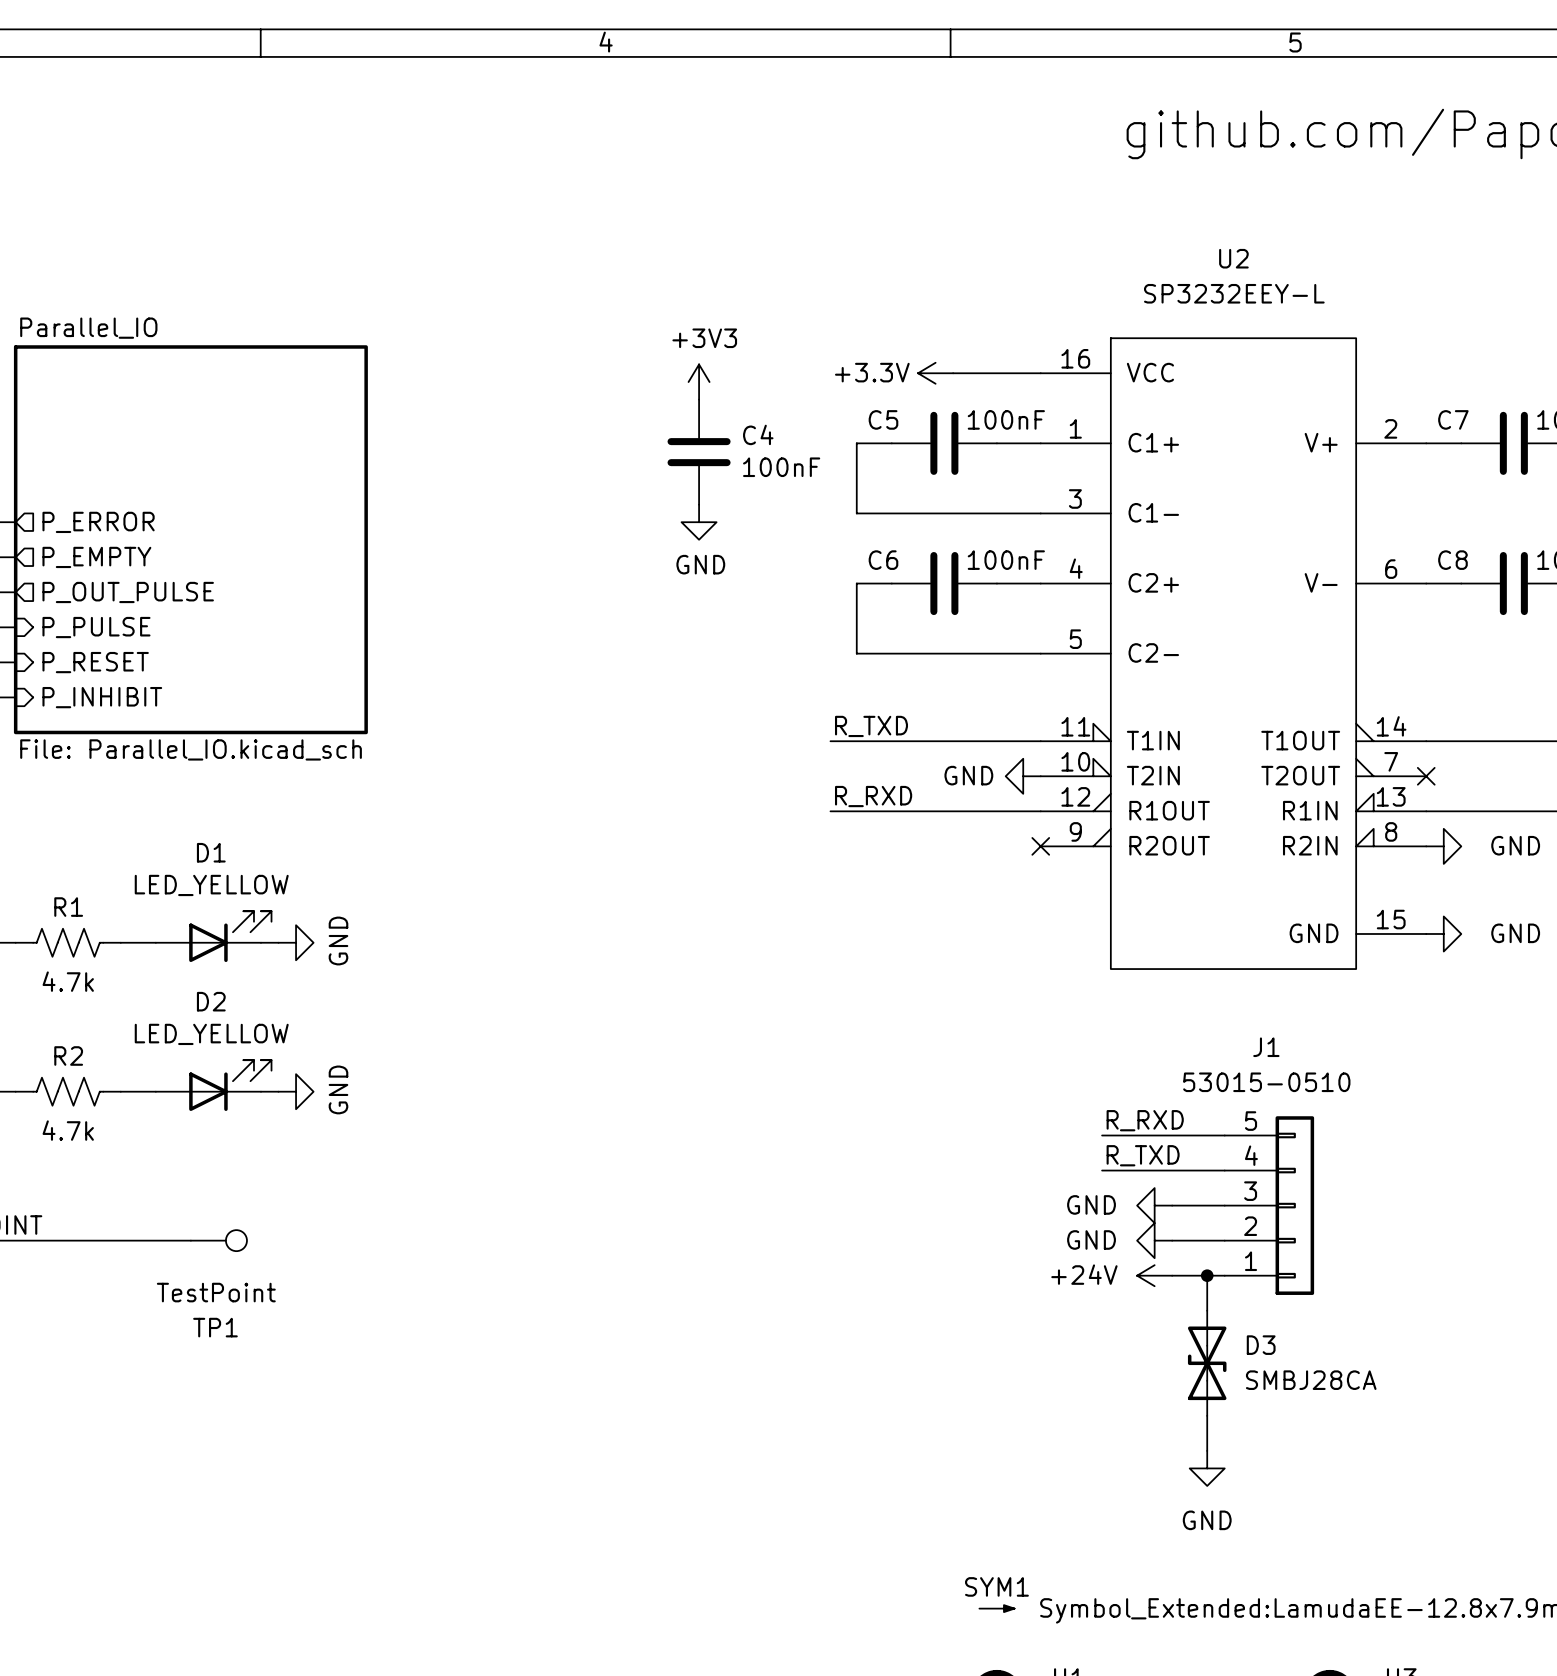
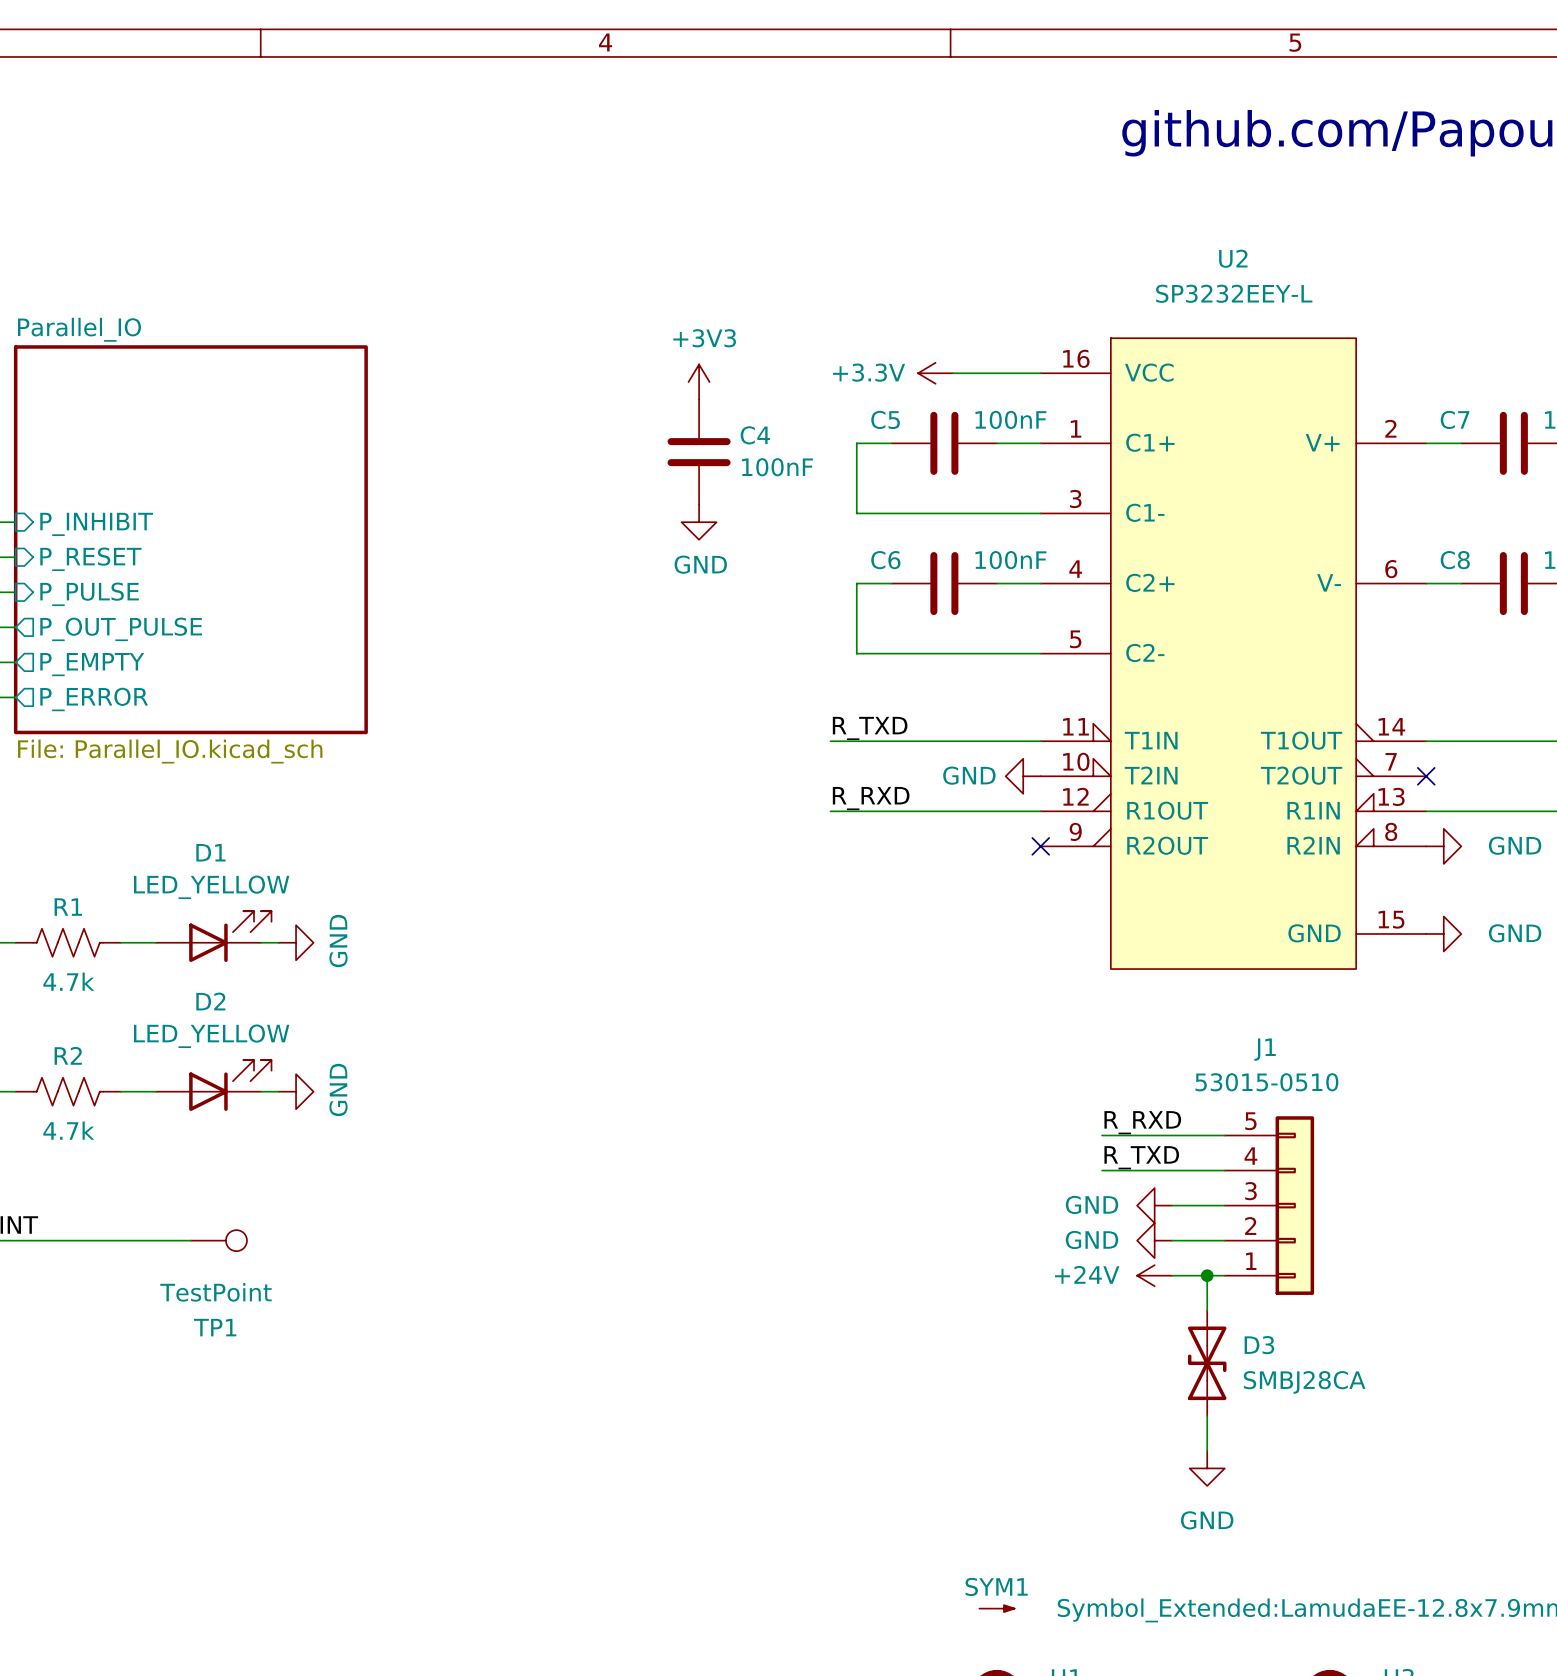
sheet pin shape: output (98, 522) -> input (96, 524)
sheet pin: P_ERROR (98, 522) -> P_INHIBIT (96, 524)
sheet pin shape: output (96, 557) -> input (90, 559)
sheet pin: P_EMPTY (96, 557) -> P_RESET (90, 559)
sheet pin shape: output (128, 592) -> input (89, 594)
sheet pin: P_OUT_PULSE (128, 592) -> P_PULSE (89, 594)
sheet pin shape: input (96, 627) -> output (121, 629)
sheet pin: P_PULSE (96, 627) -> P_OUT_PULSE (121, 629)
sheet pin shape: input (95, 662) -> output (92, 664)
sheet pin: P_RESET (95, 662) -> P_EMPTY (92, 664)
sheet pin shape: input (102, 697) -> output (94, 699)
sheet pin: P_INHIBIT (102, 697) -> P_ERROR (94, 699)

